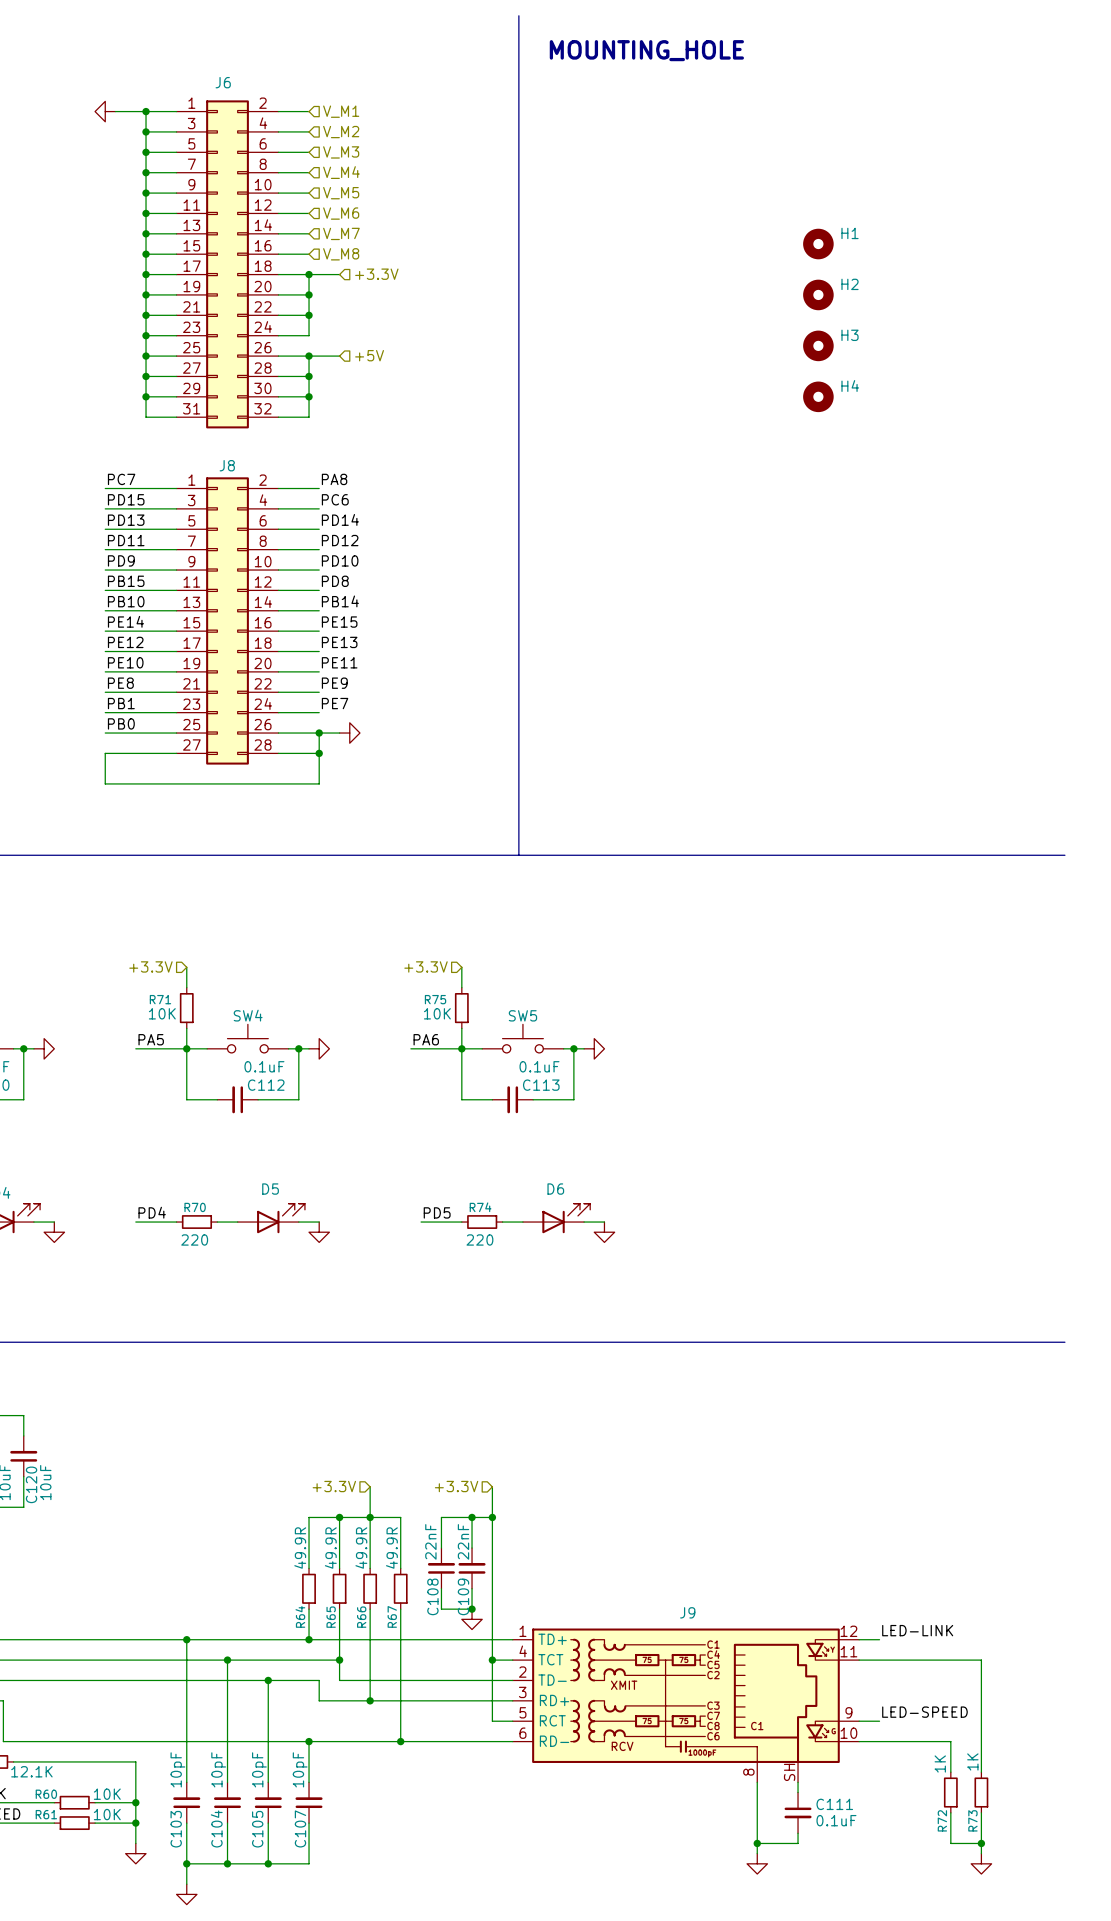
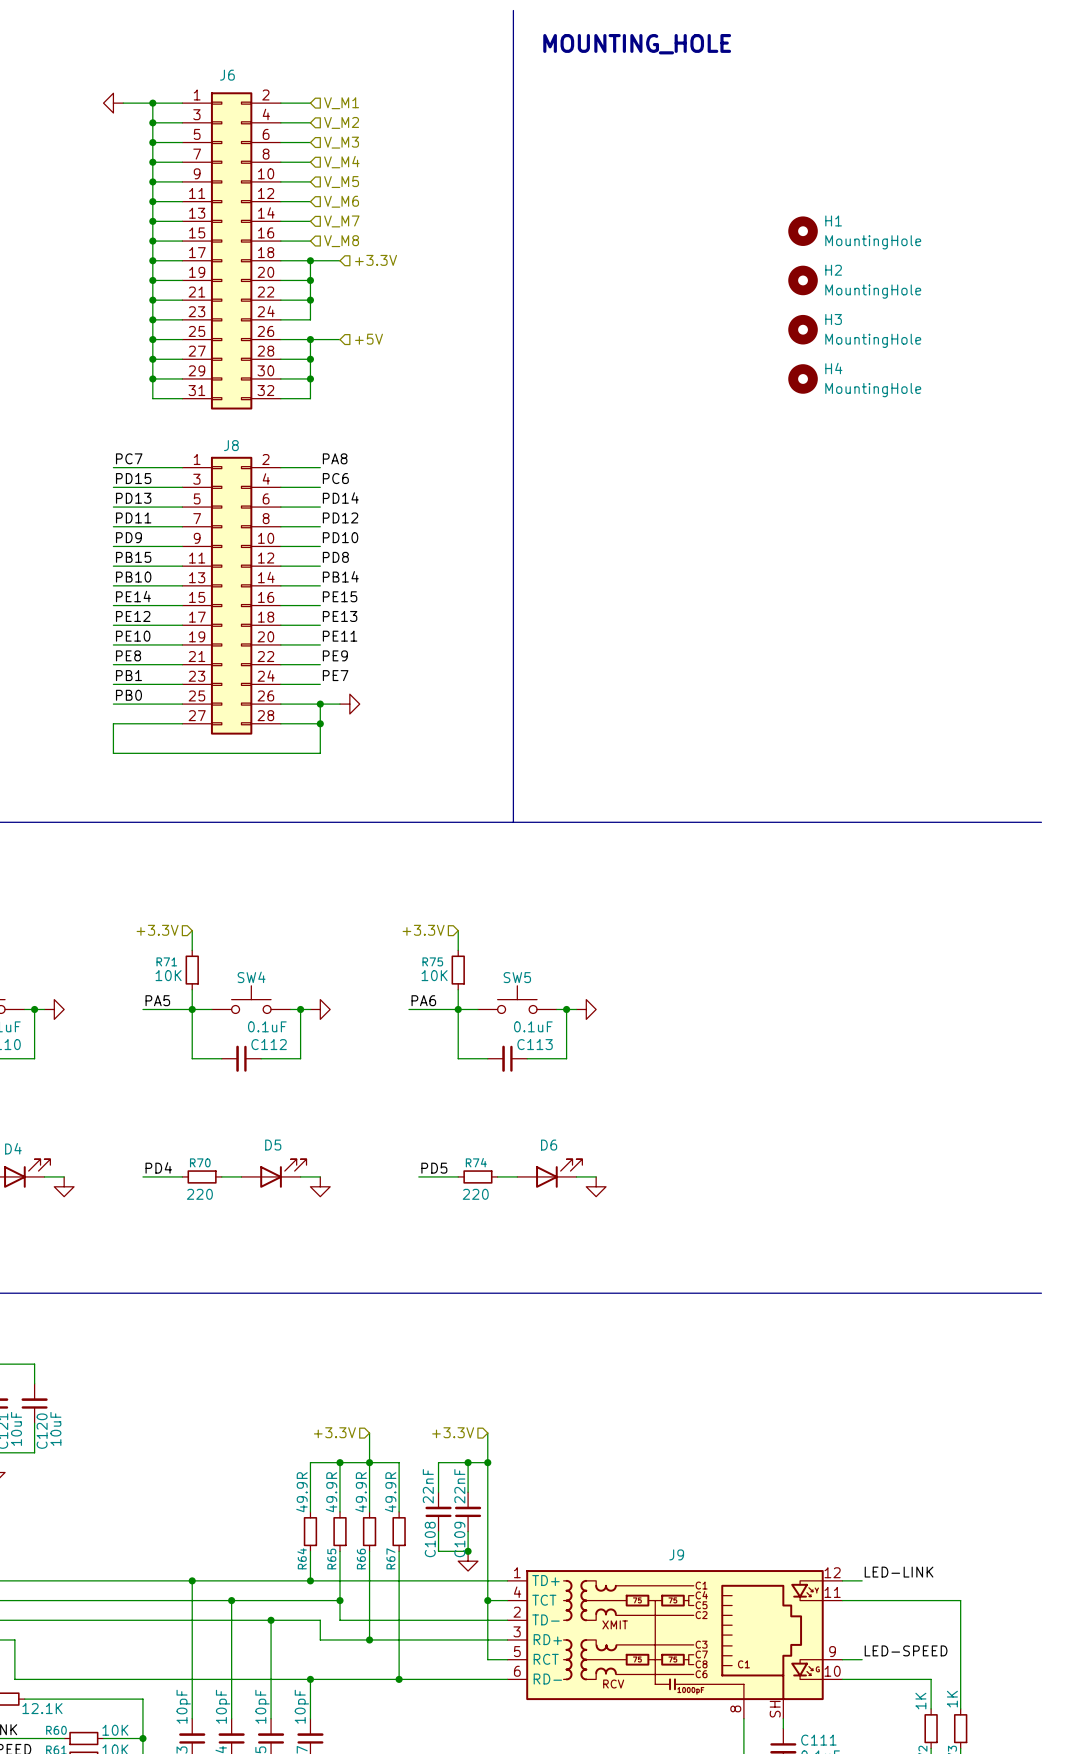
H1 value: none -> MountingHole (873, 242)
H2 value: none -> MountingHole (873, 291)
H3 value: none -> MountingHole (873, 340)
H4 value: none -> MountingHole (873, 390)

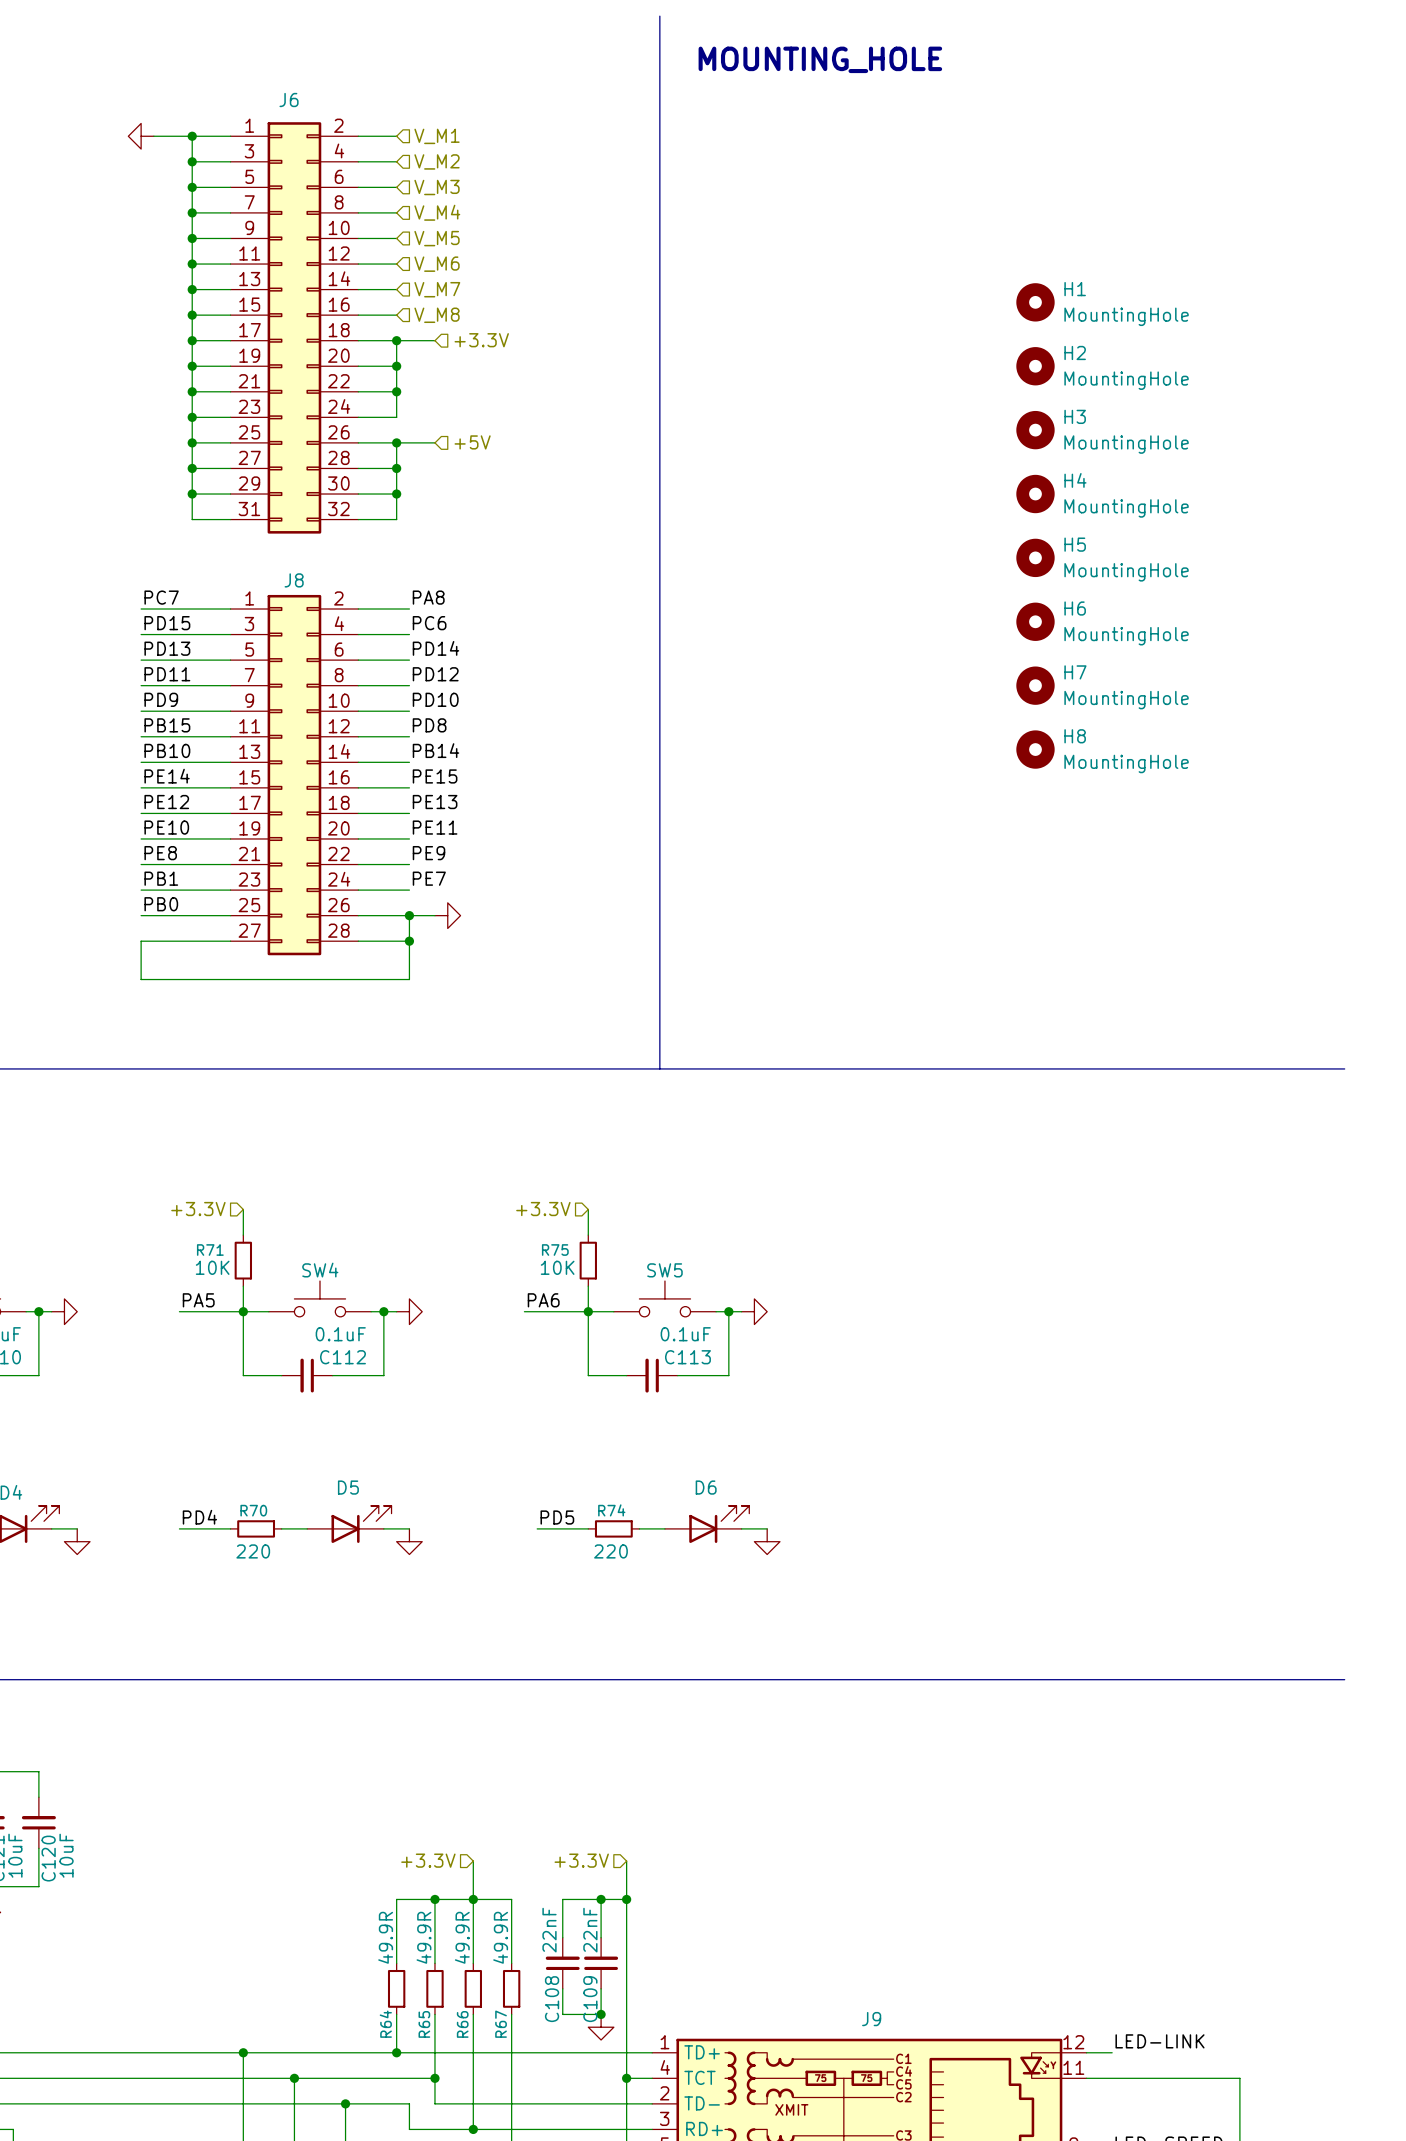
H5: none -> MountingHole (1035, 557)
H6: none -> MountingHole (1035, 621)
H7: none -> MountingHole (1035, 685)
H8: none -> MountingHole (1035, 749)

